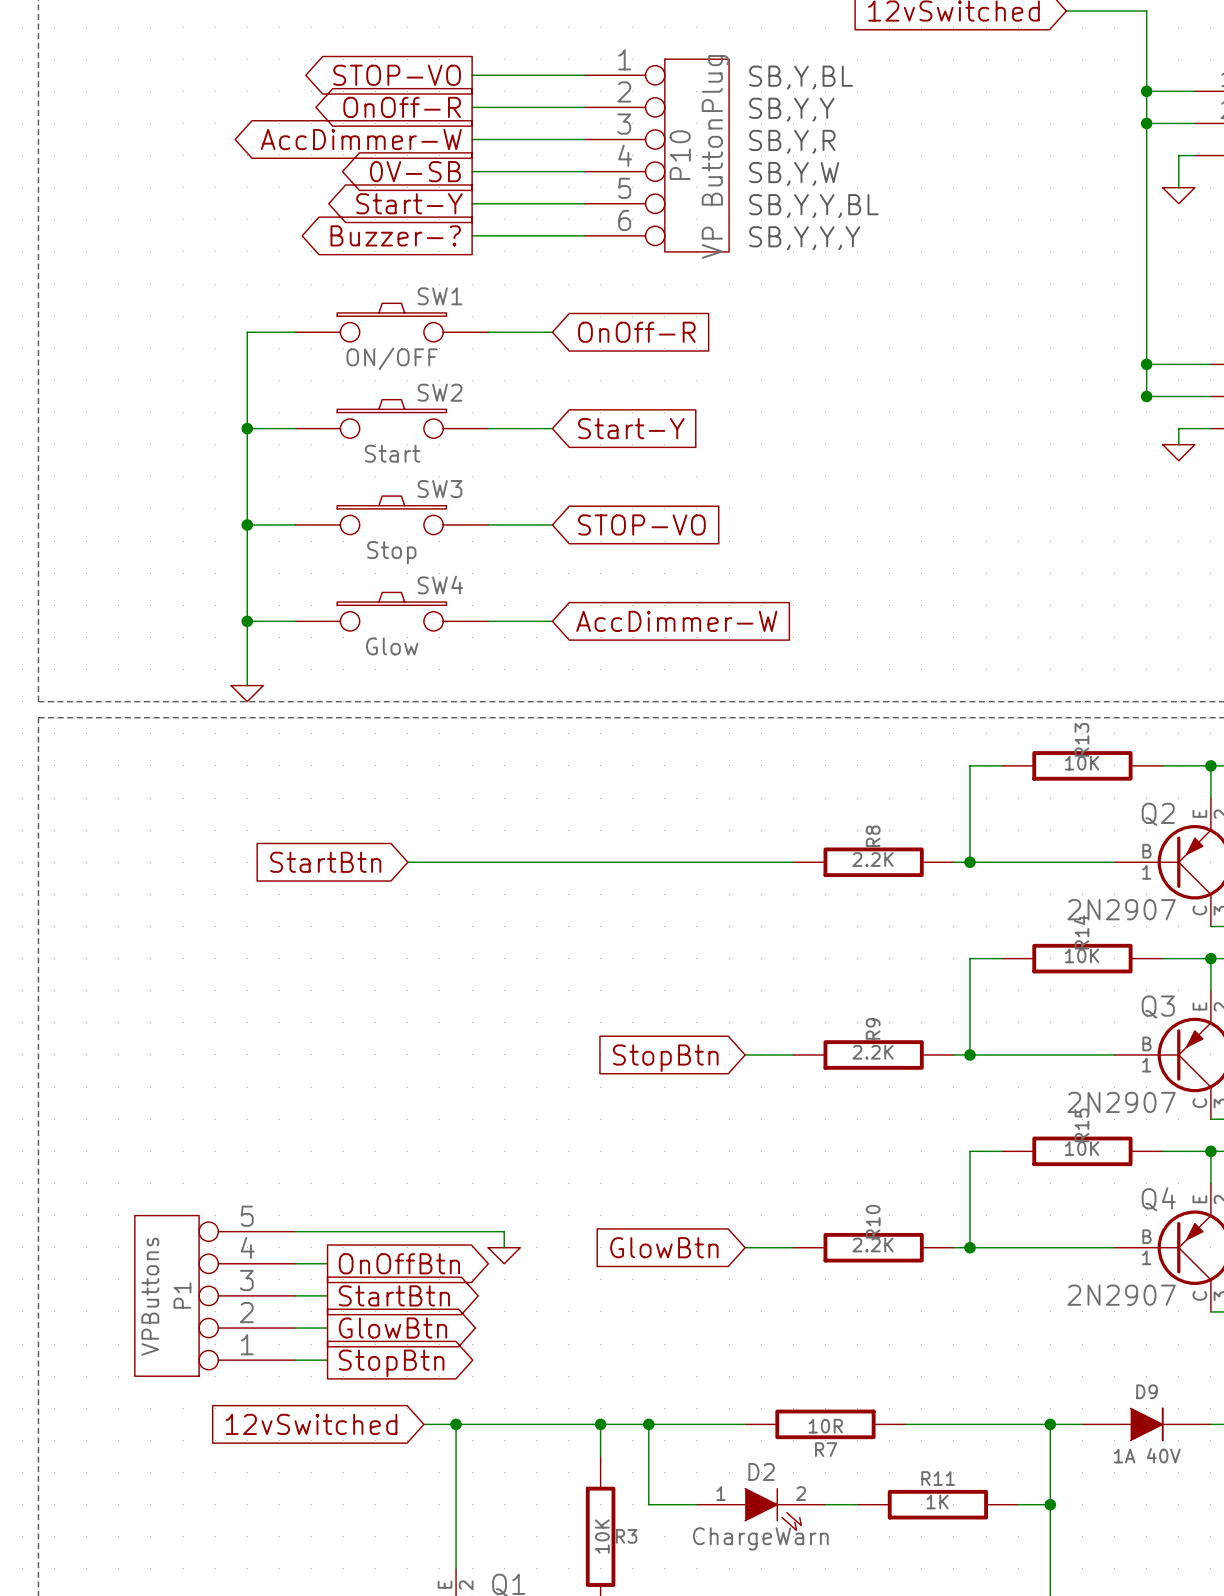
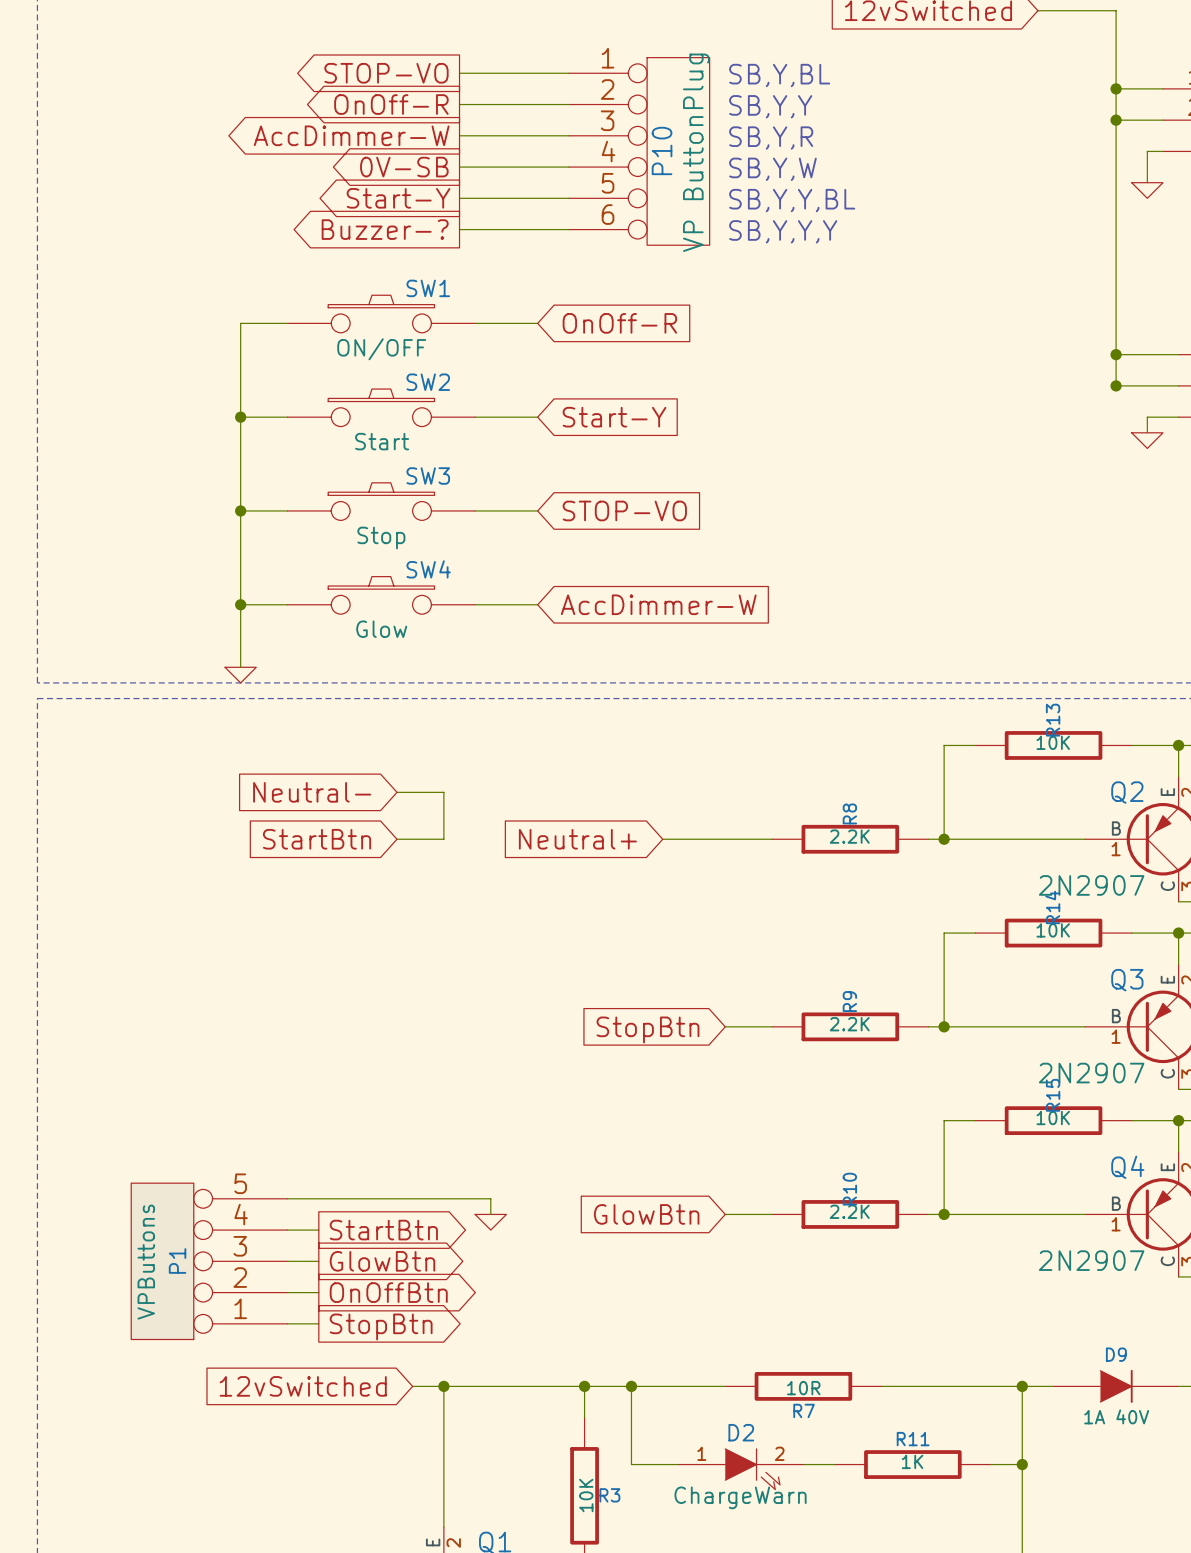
global label: none -> Neutral- (312, 792)
wire: (456, 862) (680, 862) -> (443, 839) (443, 792) (396, 792)
global label: none -> Neutral+ (577, 839)
global label: OnOffBtn (399, 1263) -> StartBtn (383, 1230)
global label: StartBtn (394, 1295) -> GlowBtn (382, 1261)
global label: GlowBtn (392, 1328) -> OnOffBtn (388, 1292)

